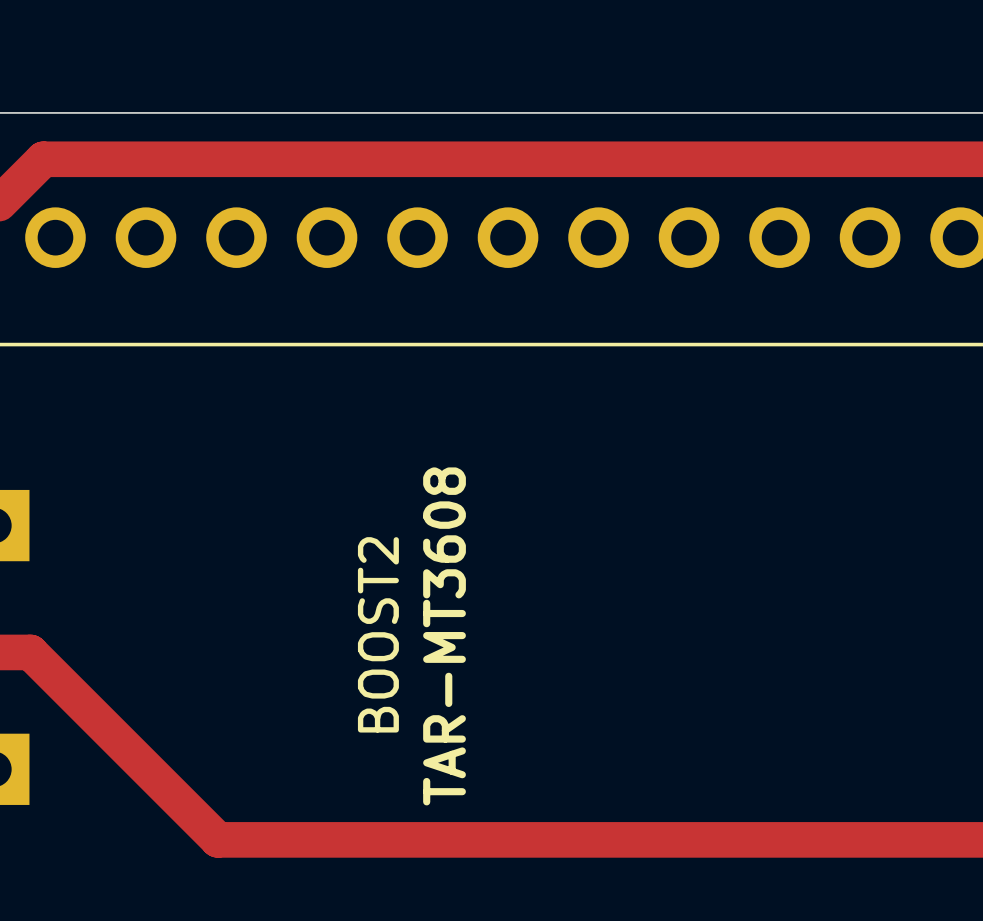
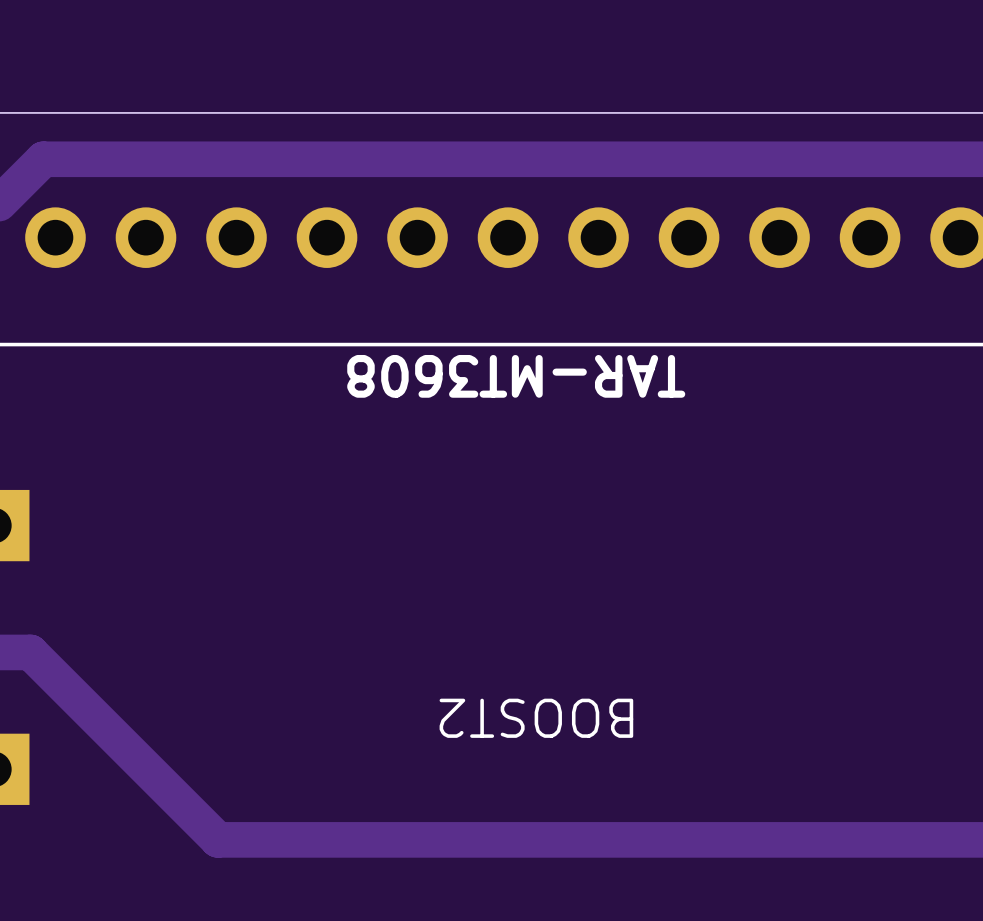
BOOST2 name rotation: 0° (378, 634) -> 90° counterclockwise (536, 718)
BOOST2 text rotation: 0° (444, 636) -> 90° counterclockwise (516, 376)

